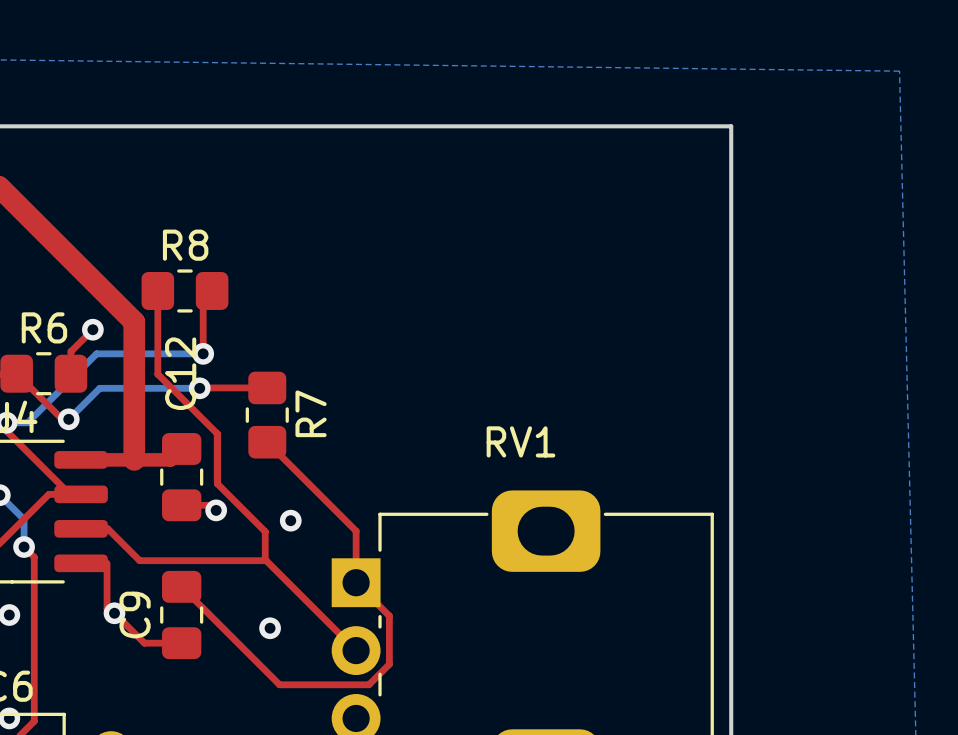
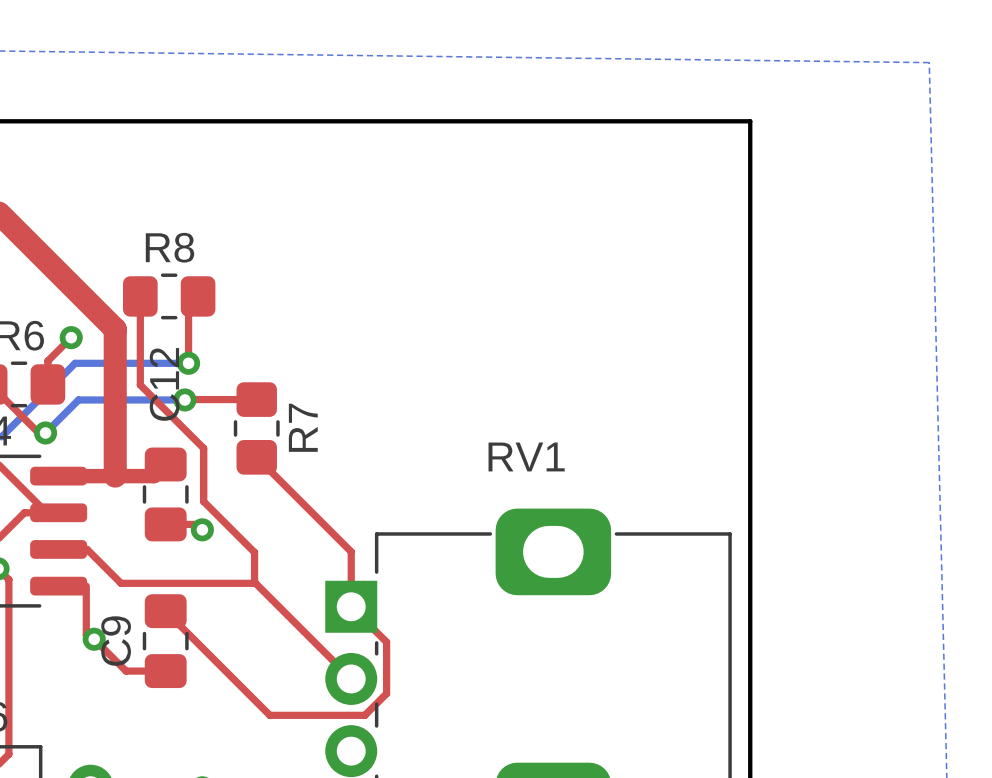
via: (290, 520) -> none
via: (270, 628) -> none

